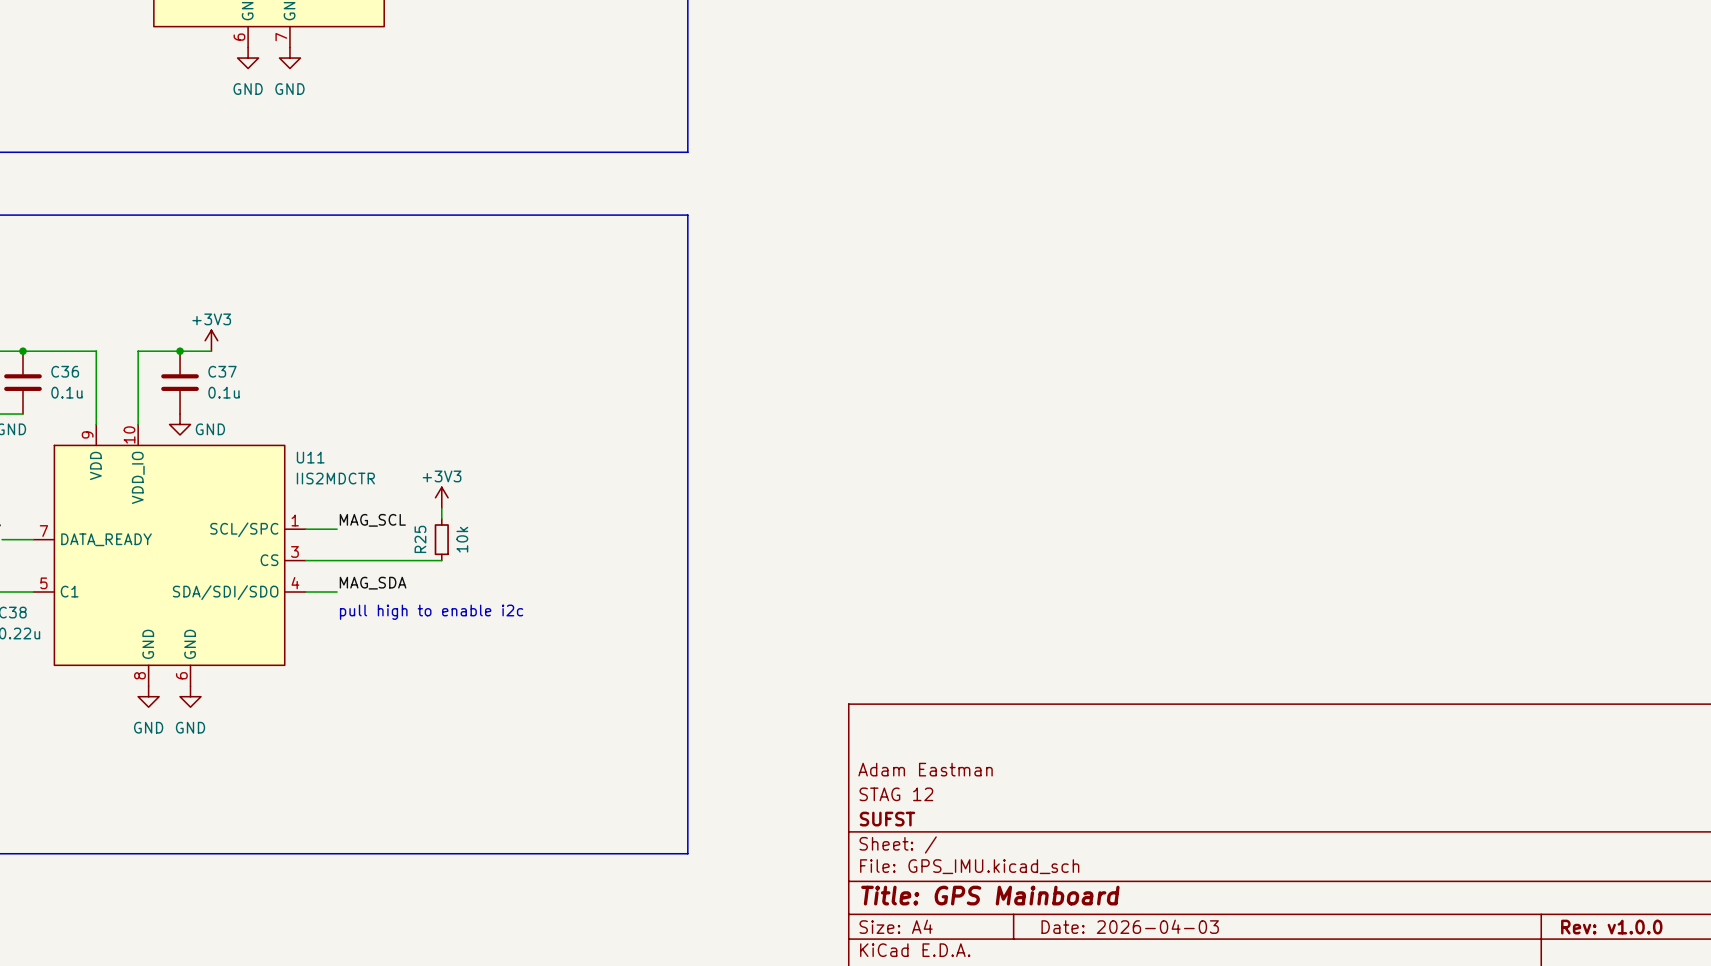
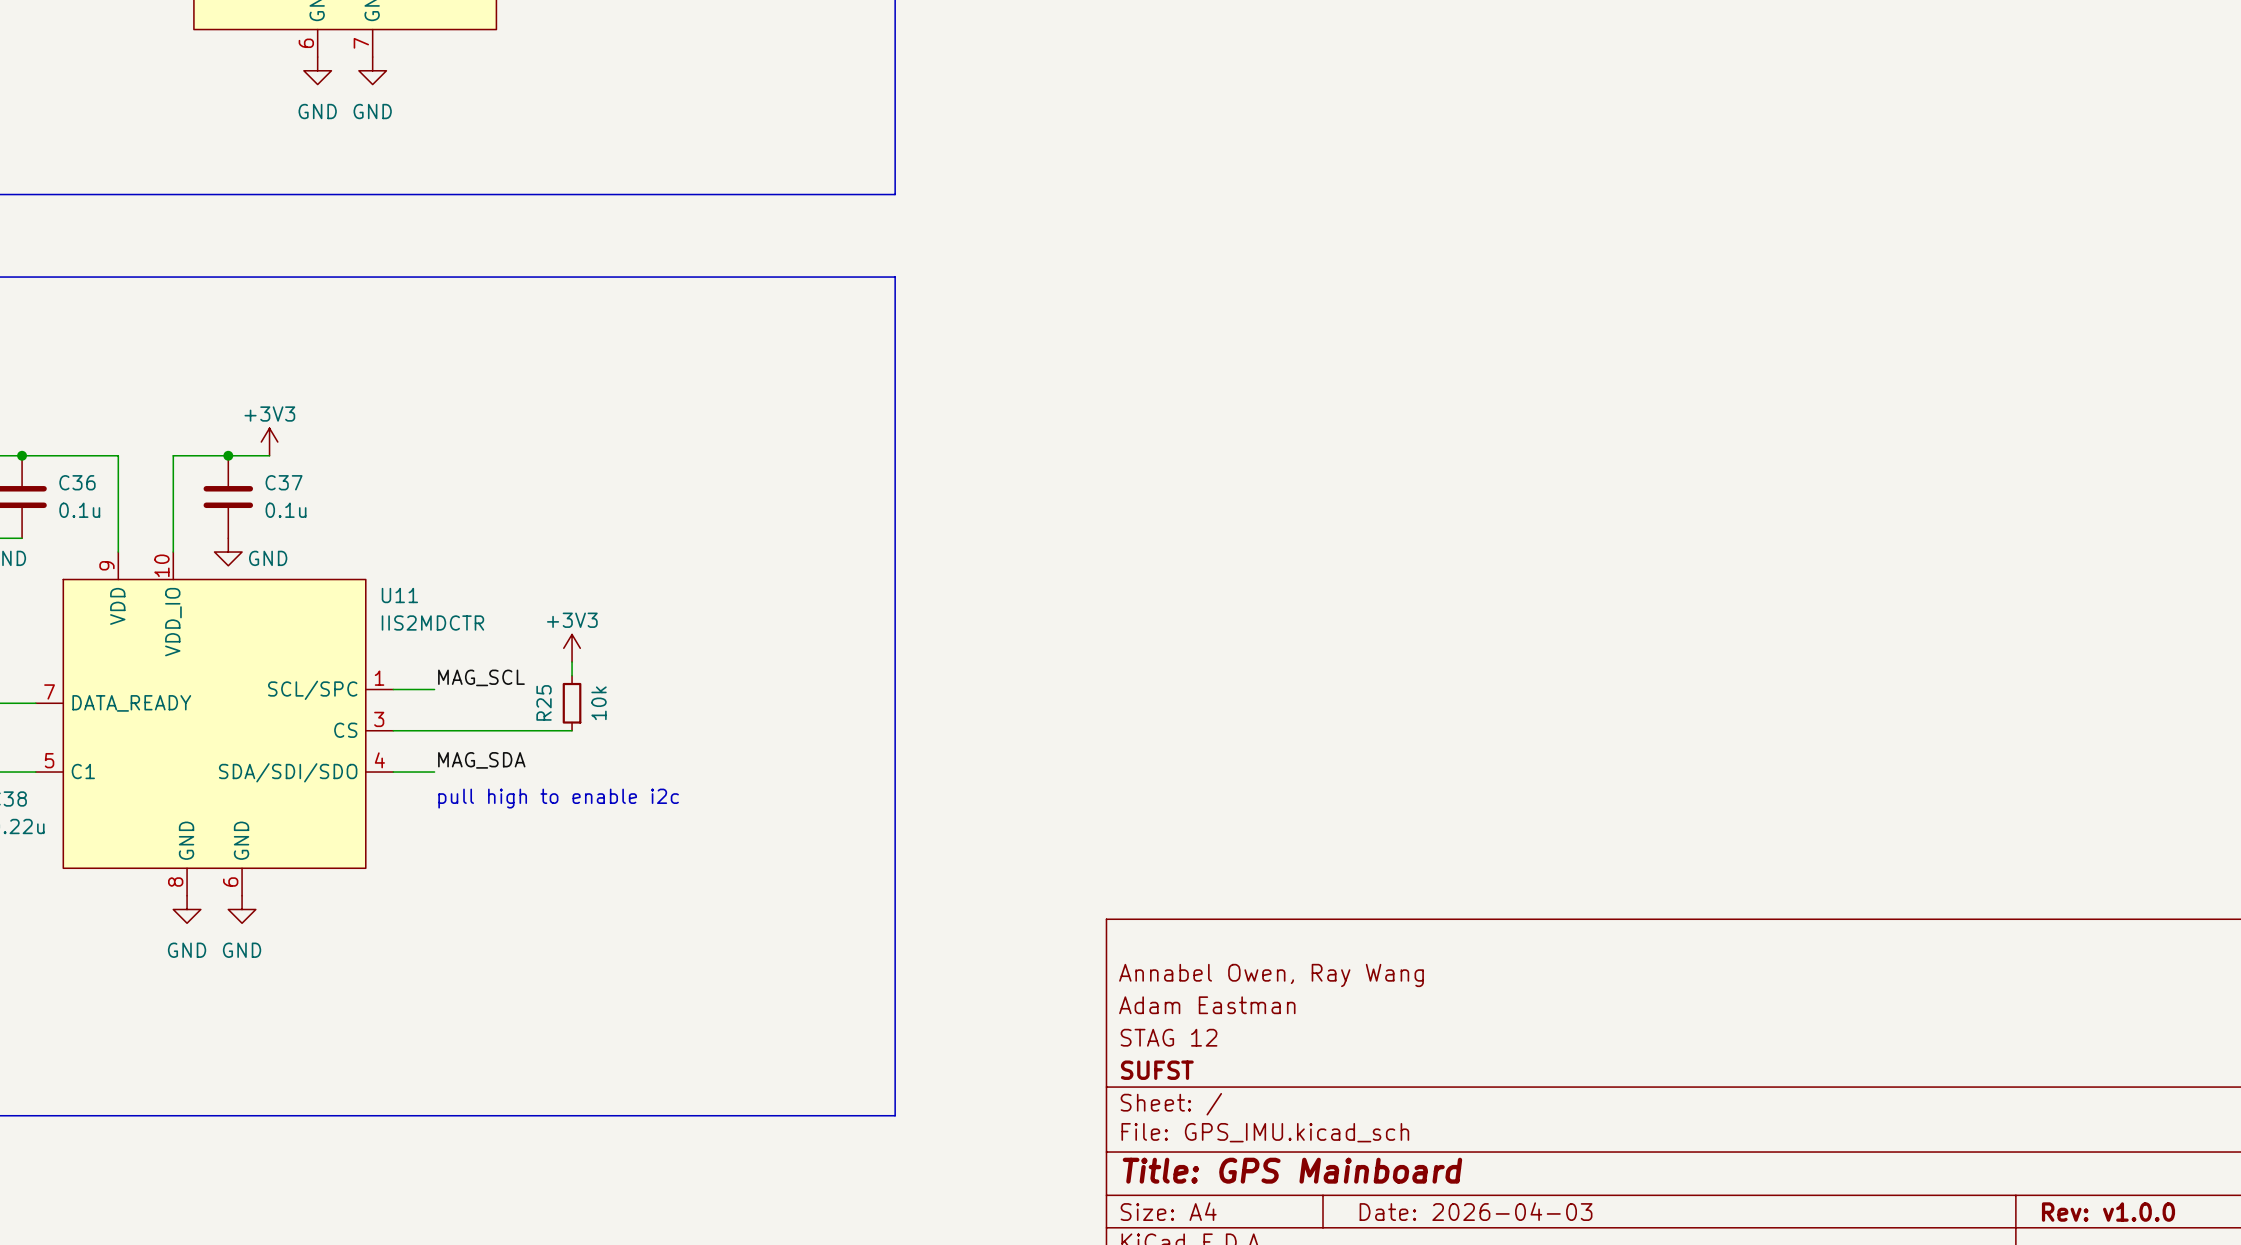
title block: none -> Annabel Owen, Ray Wang (1271, 975)

